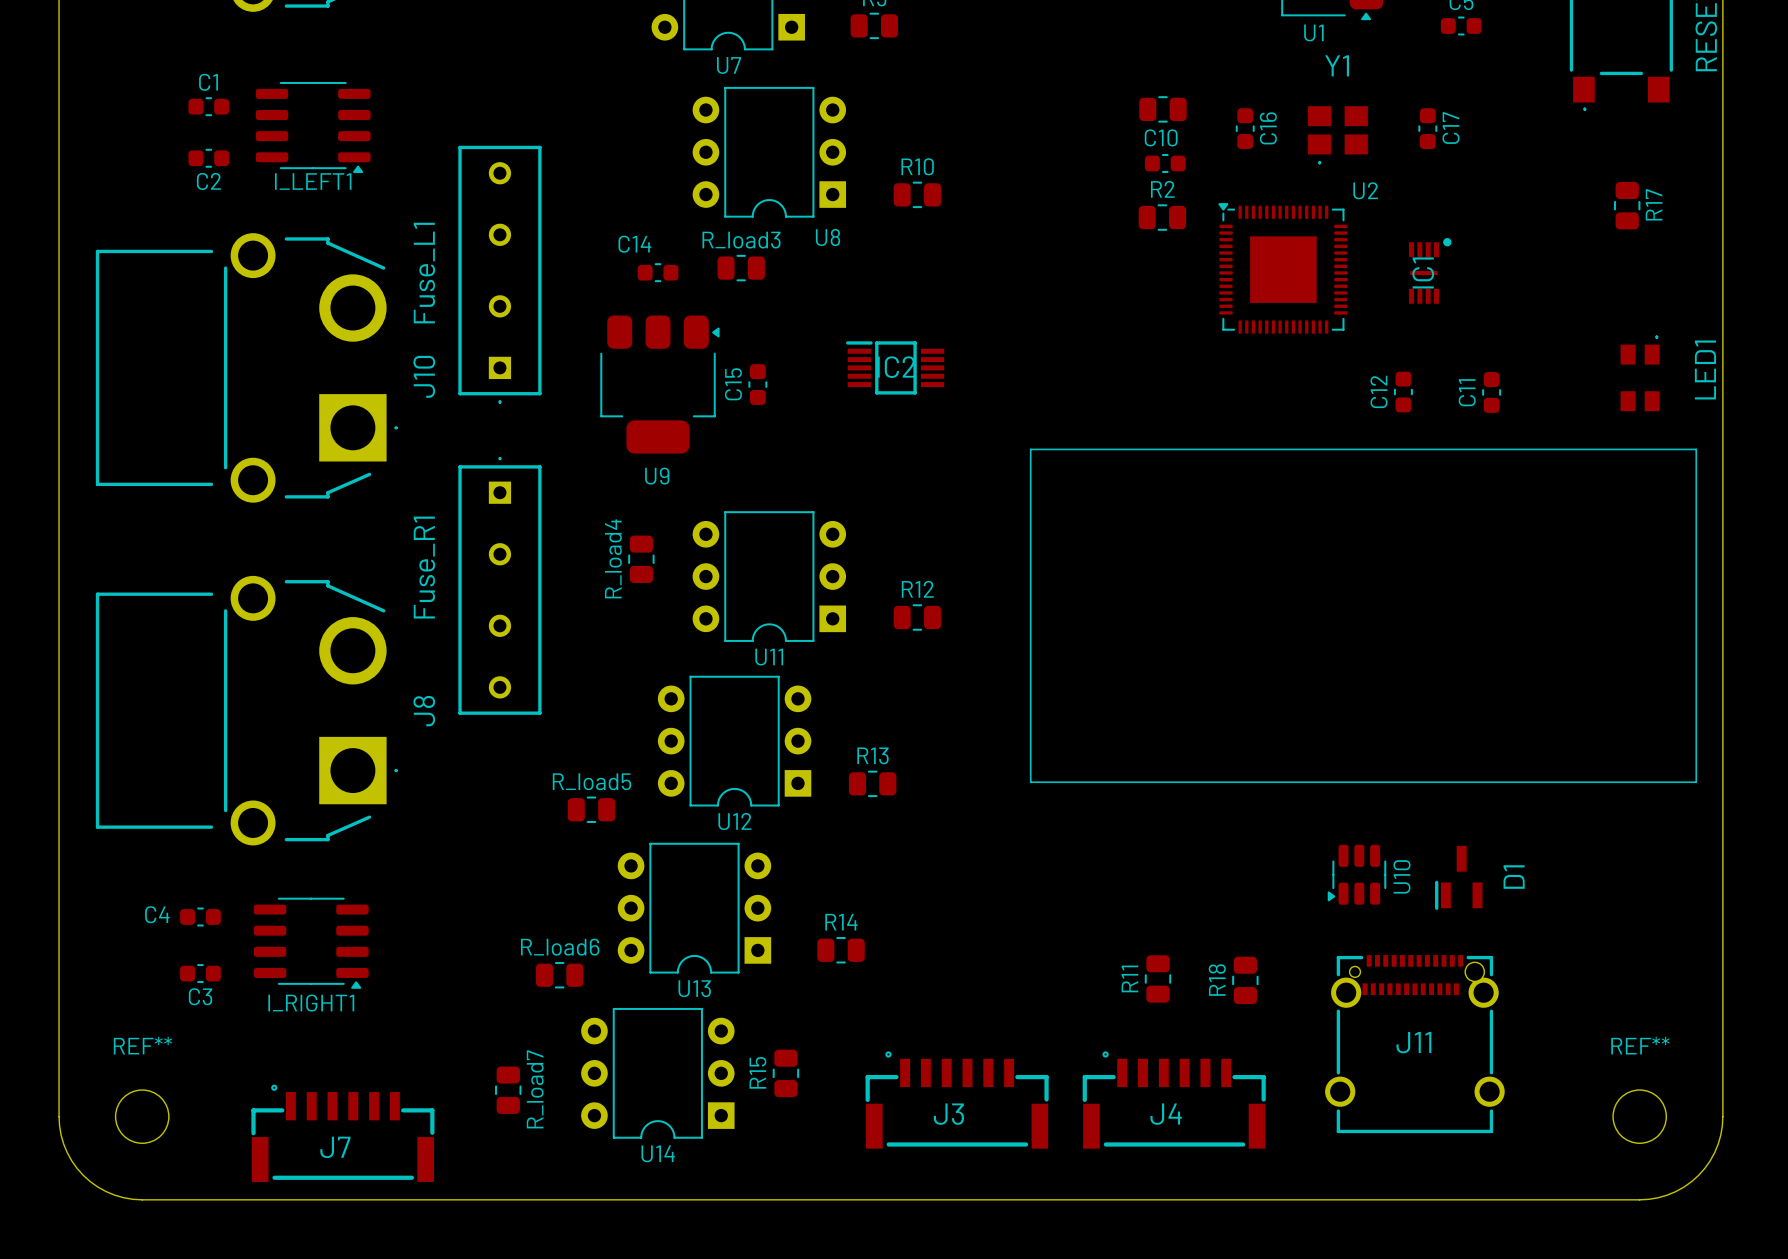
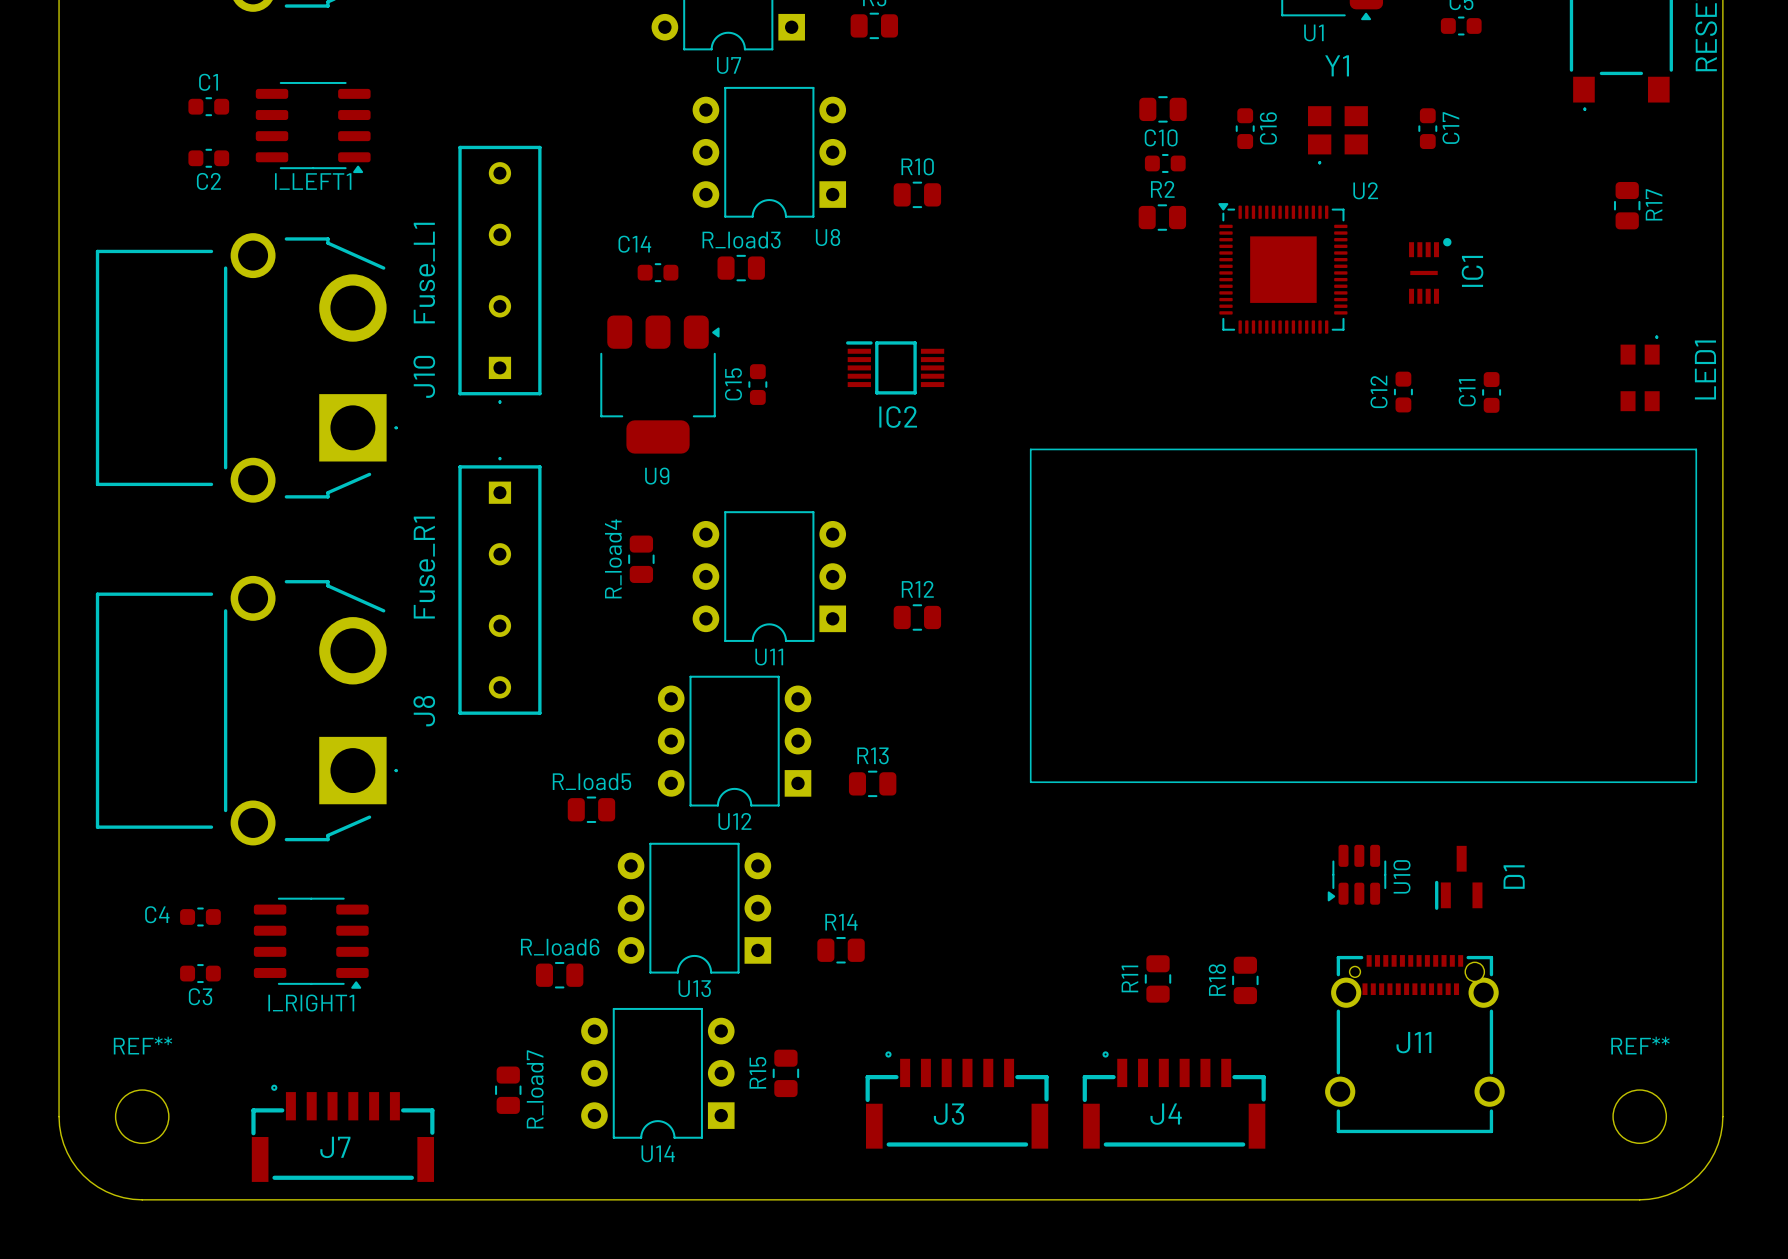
IC1 name position: IC1 (1423, 272) -> IC1 (1472, 271)
IC2 name position: IC2 (896, 367) -> IC2 (898, 417)

